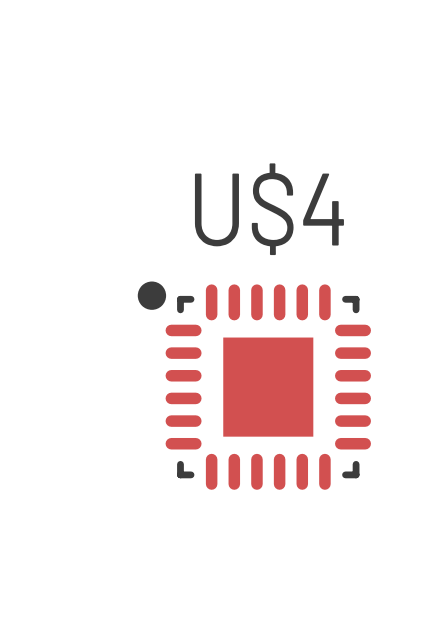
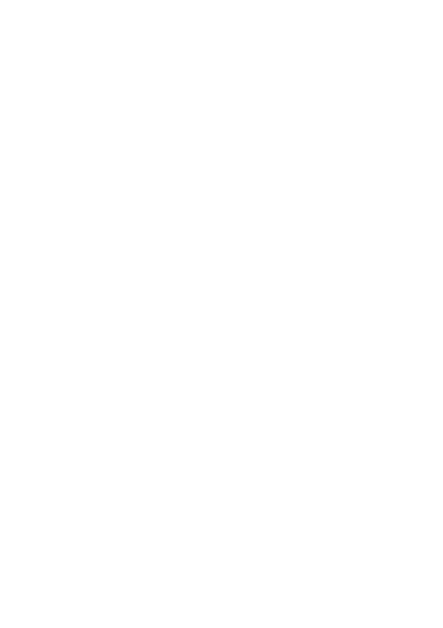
U$4: (254, 385) -> none

